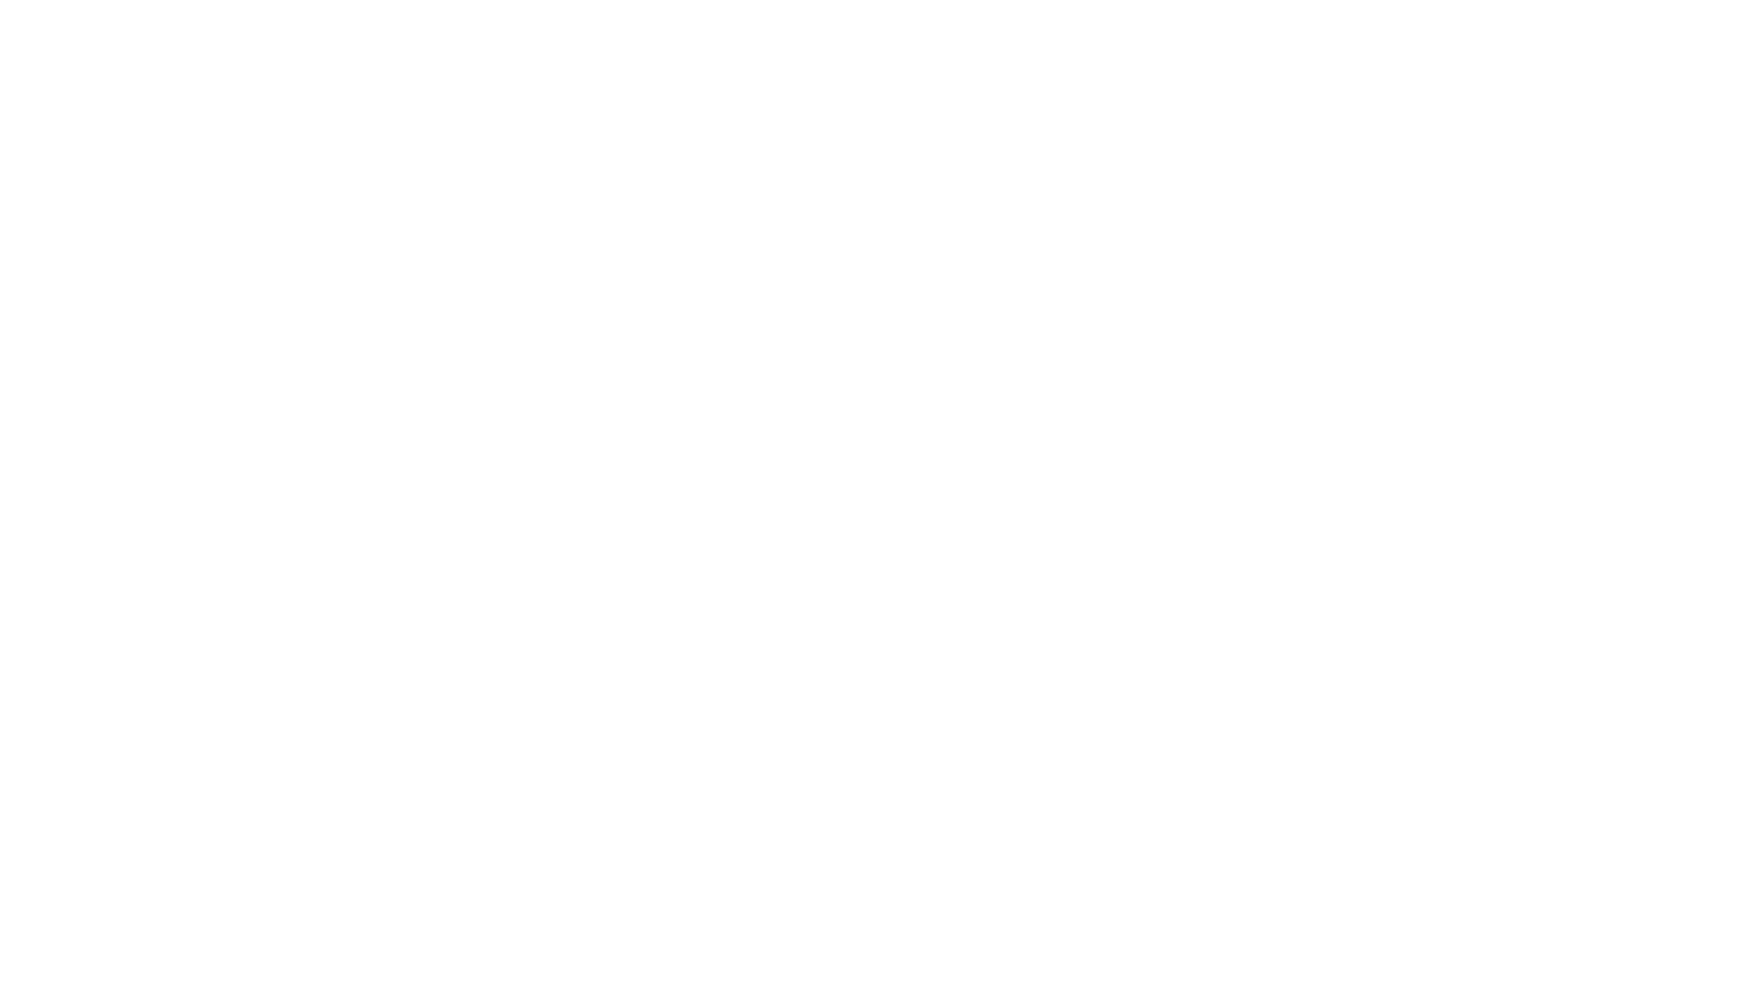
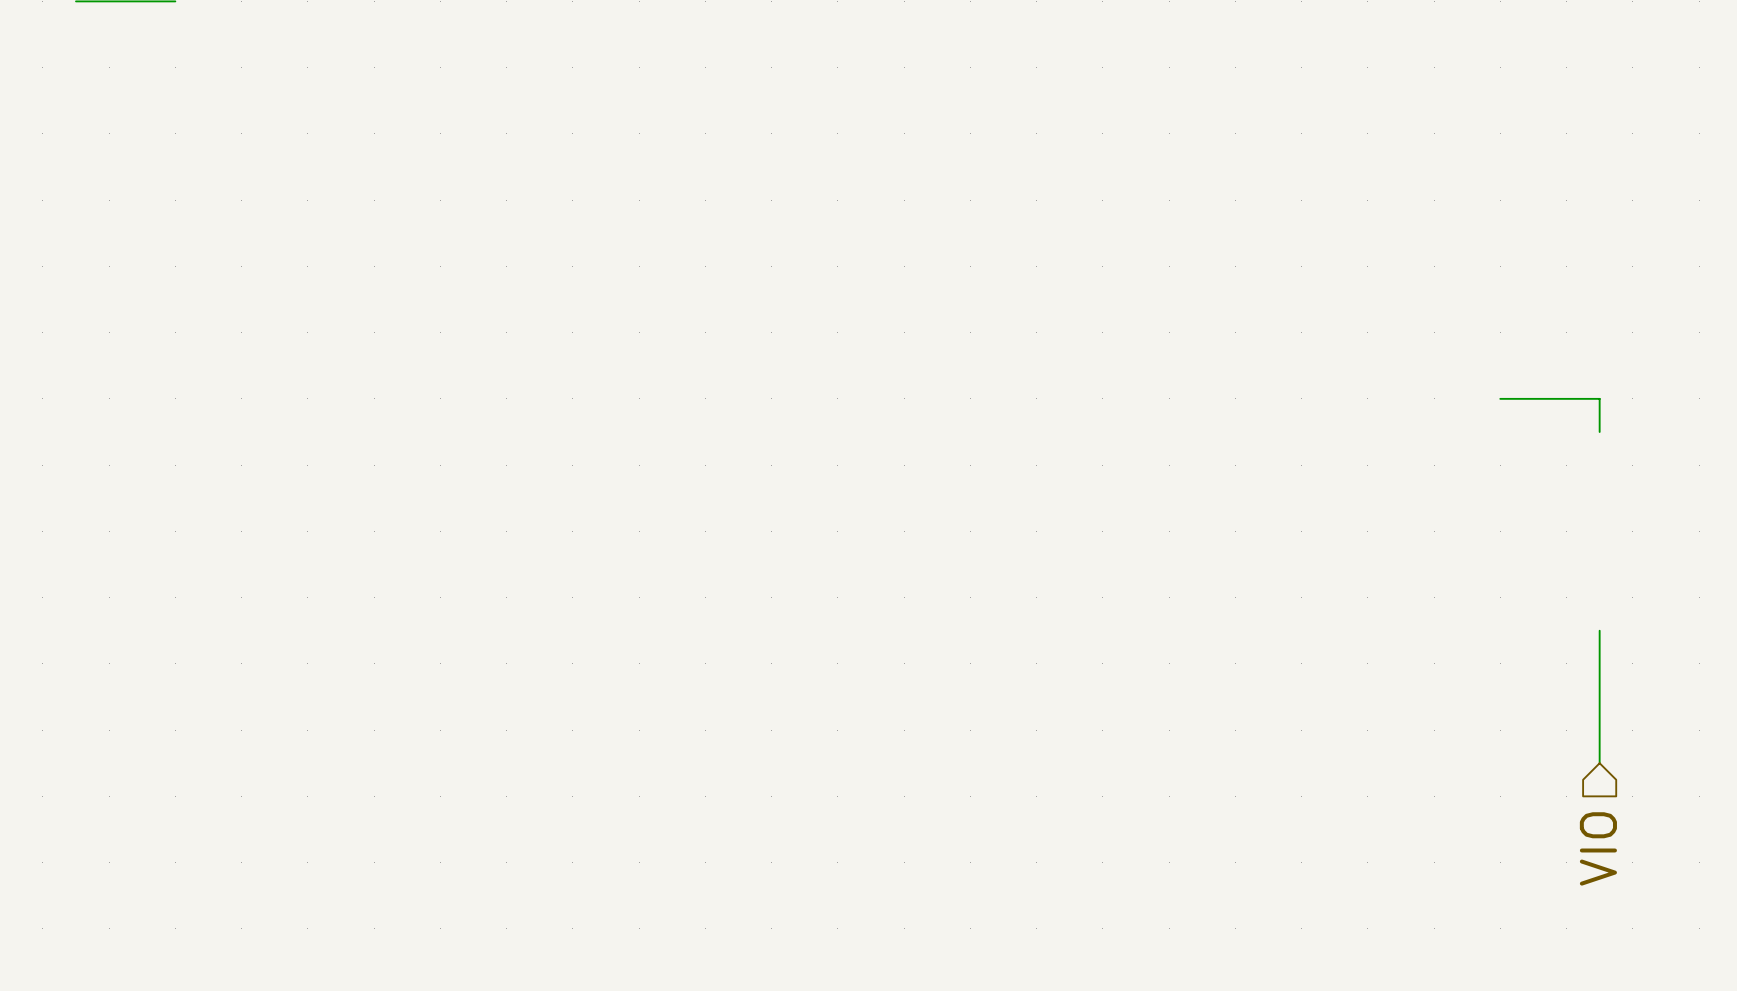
wire: none -> (75, 1) (175, 1)
wire: none -> (1500, 398) (1599, 398) (1599, 431)
wire: none -> (1599, 630) (1599, 763)
hierarchical label: none -> VIO (1598, 848)

